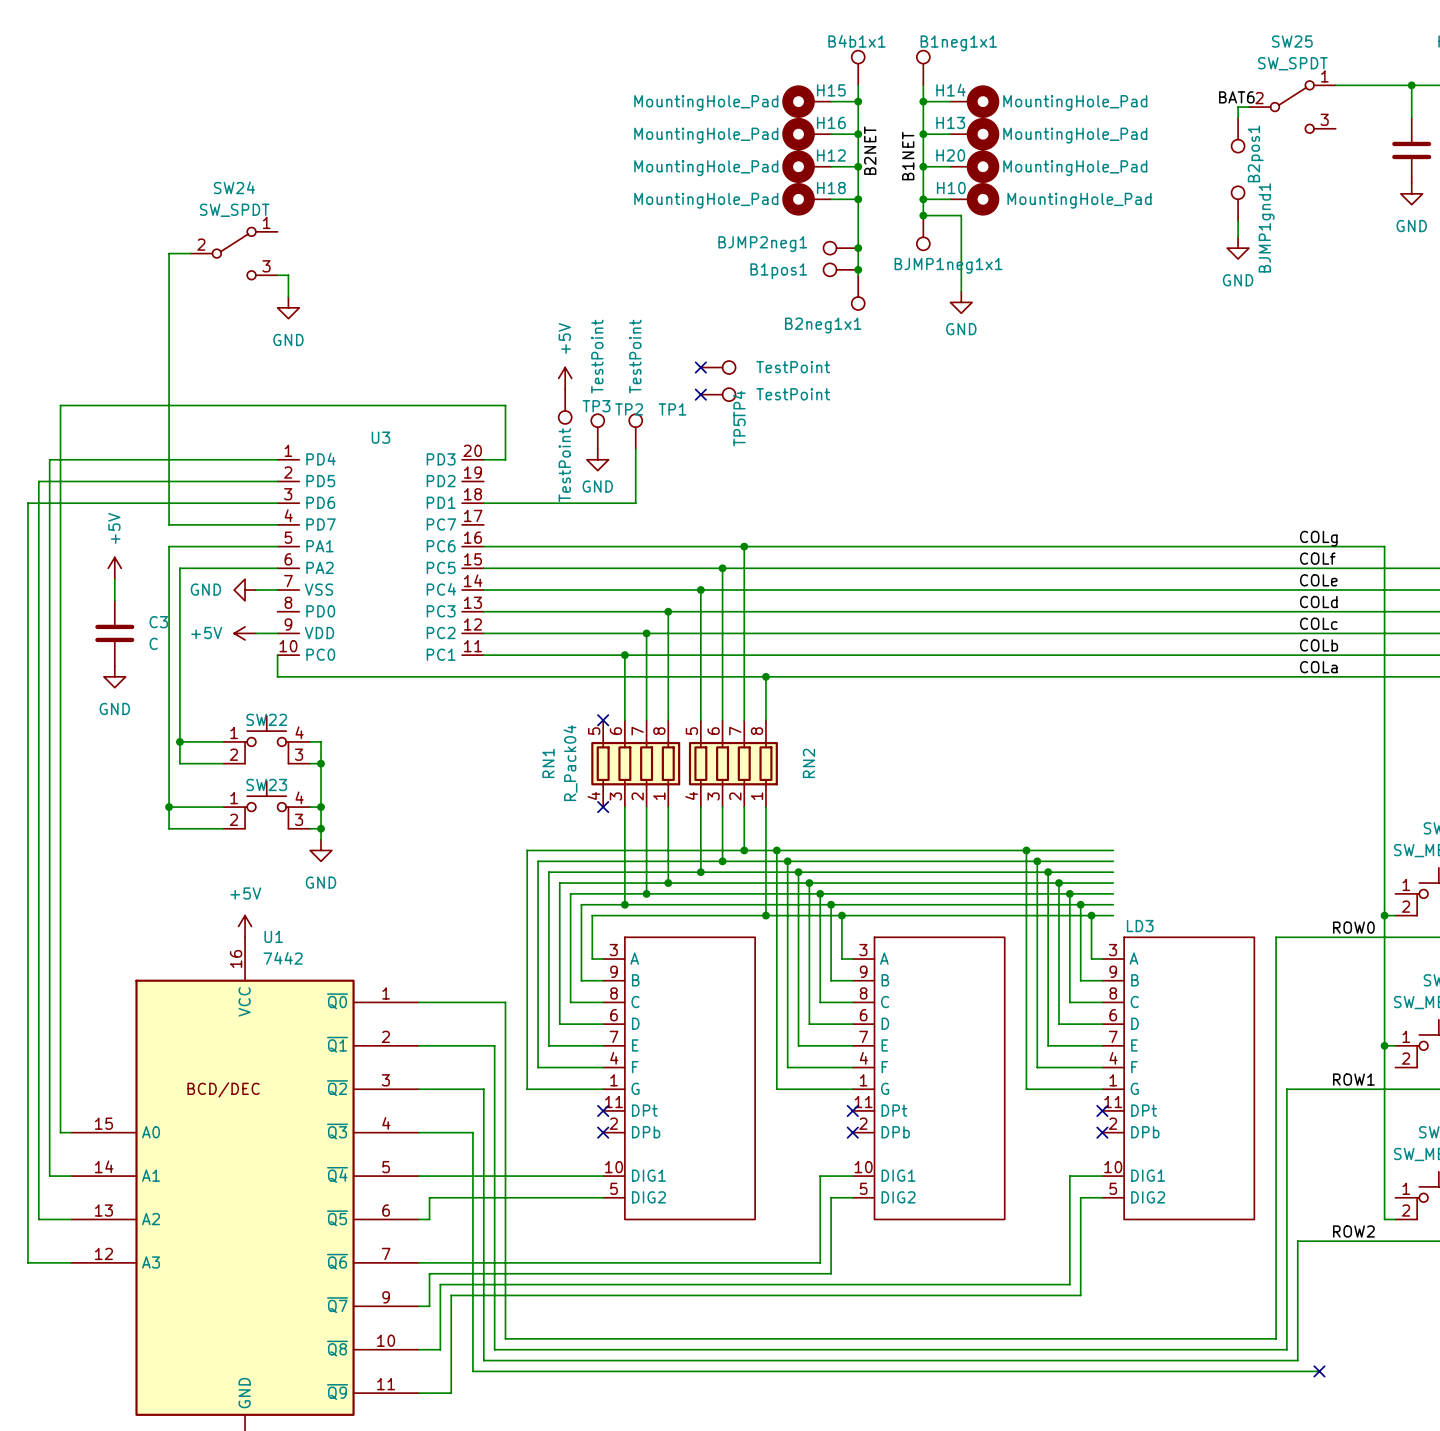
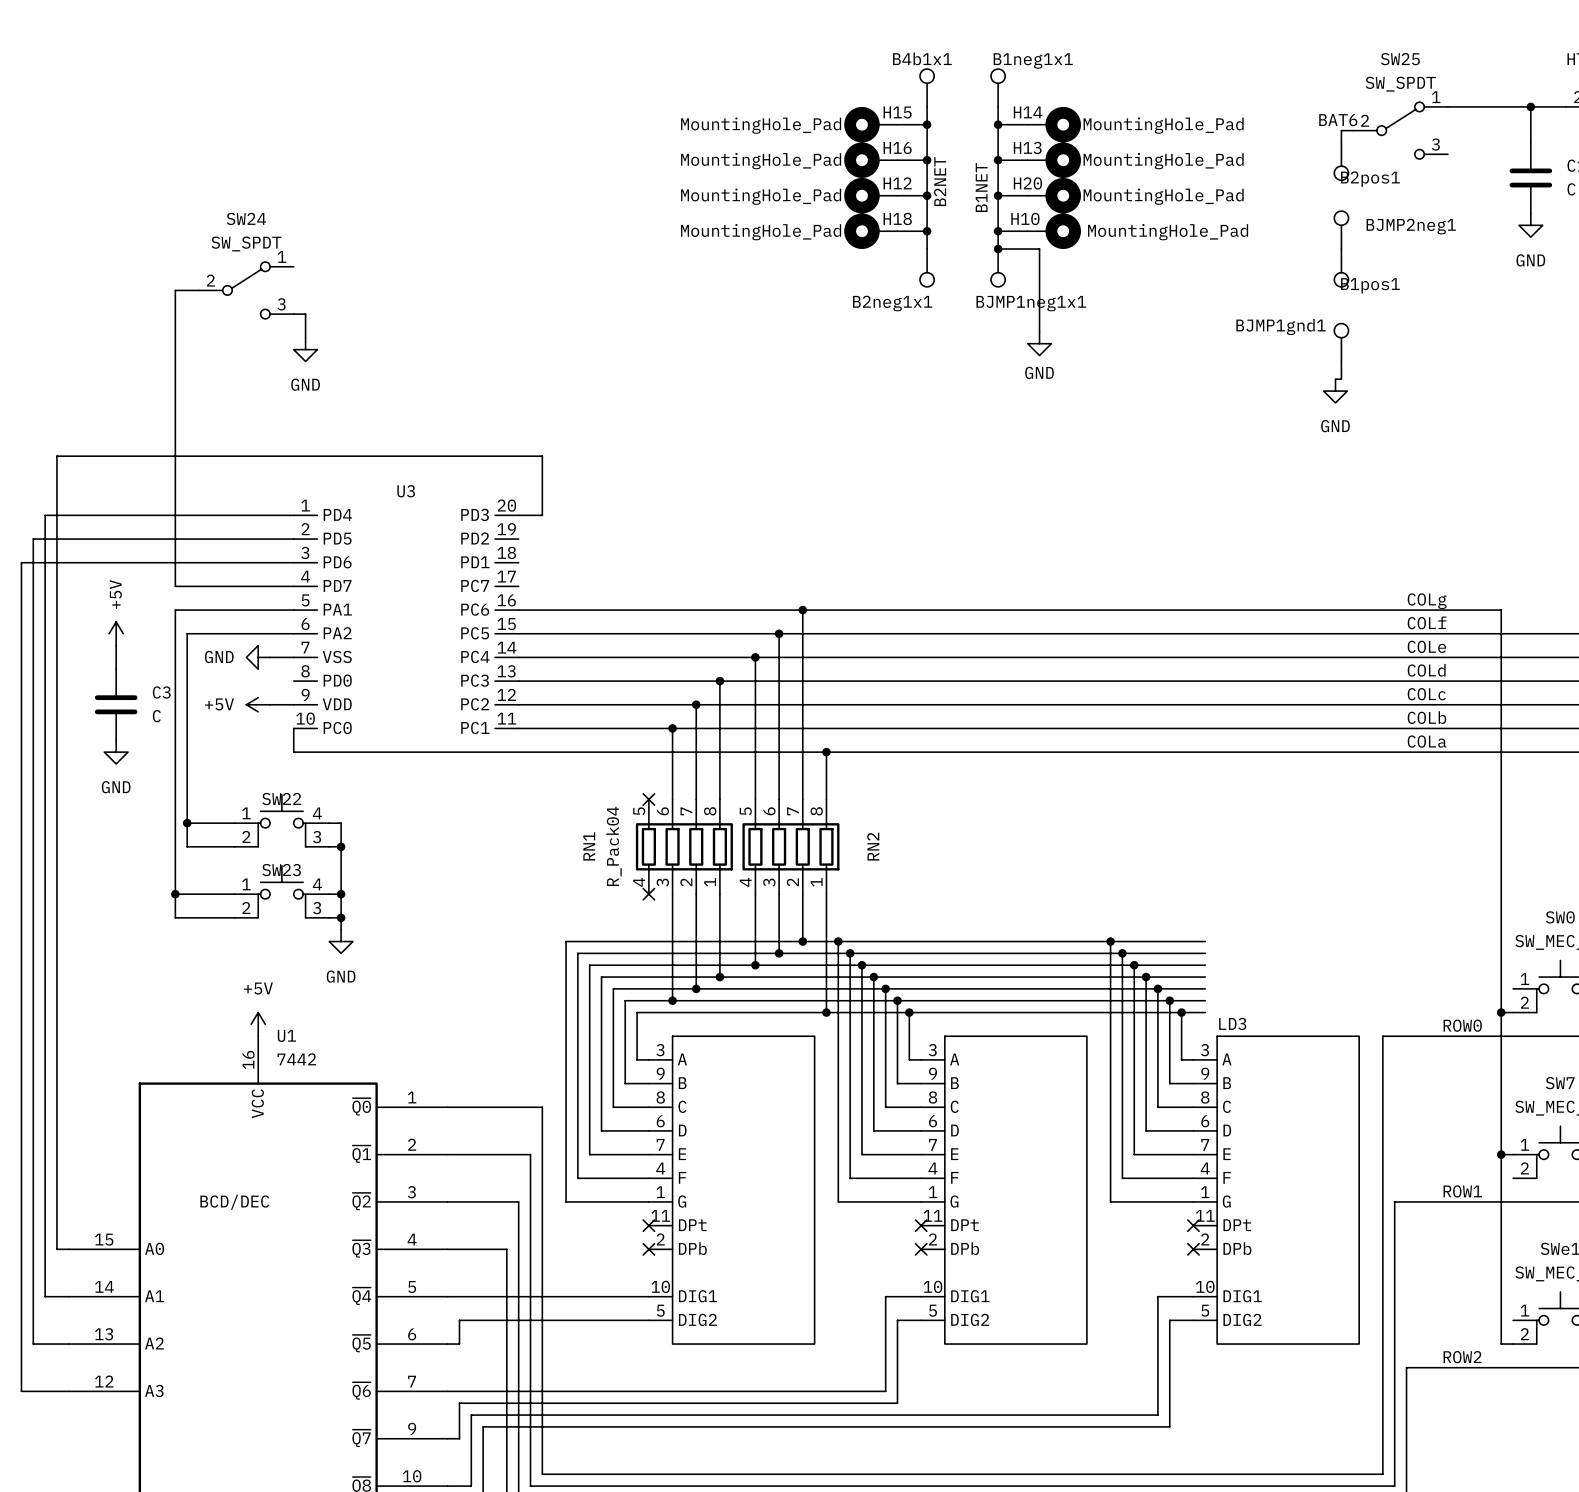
B2pos1 name rotation: 0° (1255, 153) -> 90° clockwise (1370, 179)
BJMP1gnd1 position: (1238, 203) -> (1341, 342)
BJMP1gnd1 name rotation: 0° (1266, 227) -> 90° clockwise (1281, 326)
BJMP2neg1 name position: BJMP2neg1 (762, 244) -> BJMP2neg1 (1411, 226)
BJMP2neg1 rotation: 0° (830, 248) -> 90° clockwise (1341, 218)
BJMP2neg1 position: (840, 248) -> (1341, 230)
junction: (858, 248) -> none
power symbol position: GND (1238, 248) -> GND (1335, 391)
B1pos1 rotation: 0° (830, 269) -> 90° counterclockwise (1341, 279)
B1pos1 position: (840, 269) -> (1341, 267)
junction: (858, 269) -> none
B1pos1 name position: B1pos1 (778, 271) -> B1pos1 (1370, 285)
B2neg1x1 position: (858, 292) -> (927, 267)
wire: none -> (1341, 361) (1341, 379) (1335, 379)
no-connect mark: (700, 367) -> none
TP4: TestPoint (718, 367) -> none
power symbol: +5V (565, 378) -> none
no-connect mark: (700, 394) -> none
TP5: TestPoint (718, 394) -> none
TP3: TestPoint (565, 406) -> none
TP2: TestPoint (597, 431) -> none
TP1: TestPoint (635, 431) -> none
wire: (635, 448) (635, 503) (483, 503) -> none
power symbol: GND (597, 459) -> none

